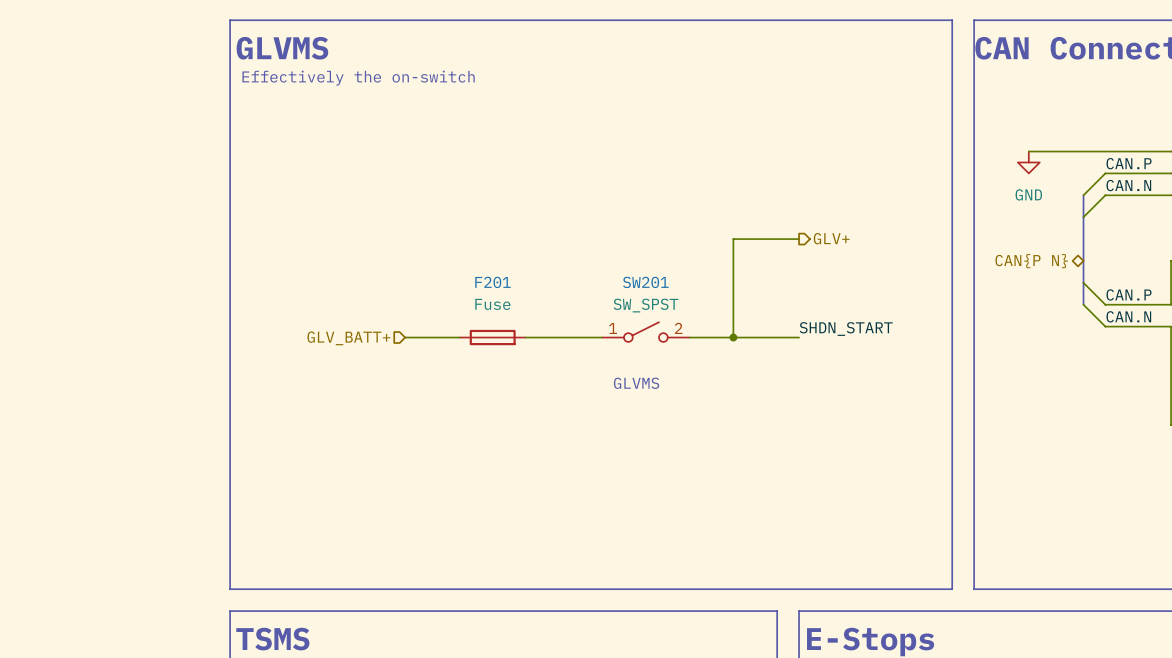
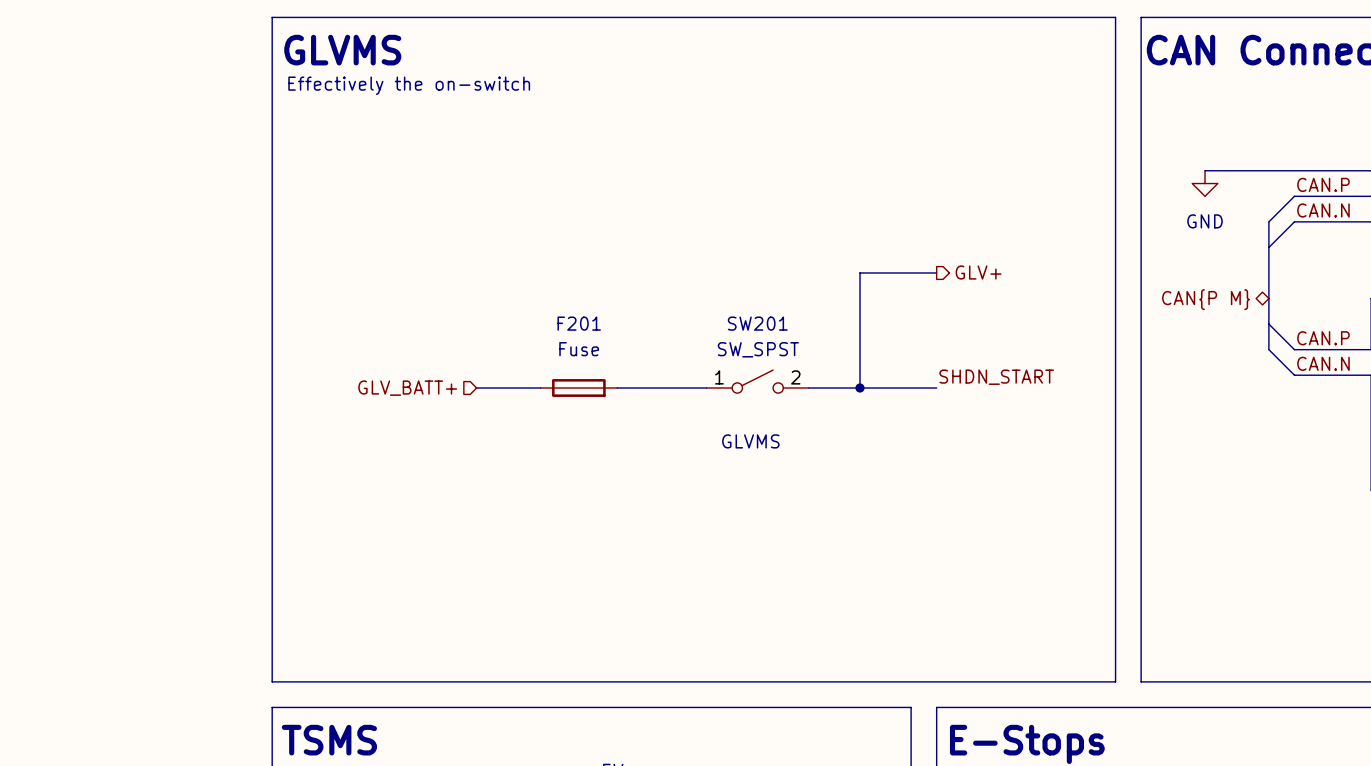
hierarchical label: CAN{P N} (1031, 261) -> CAN{P M} (1206, 299)

